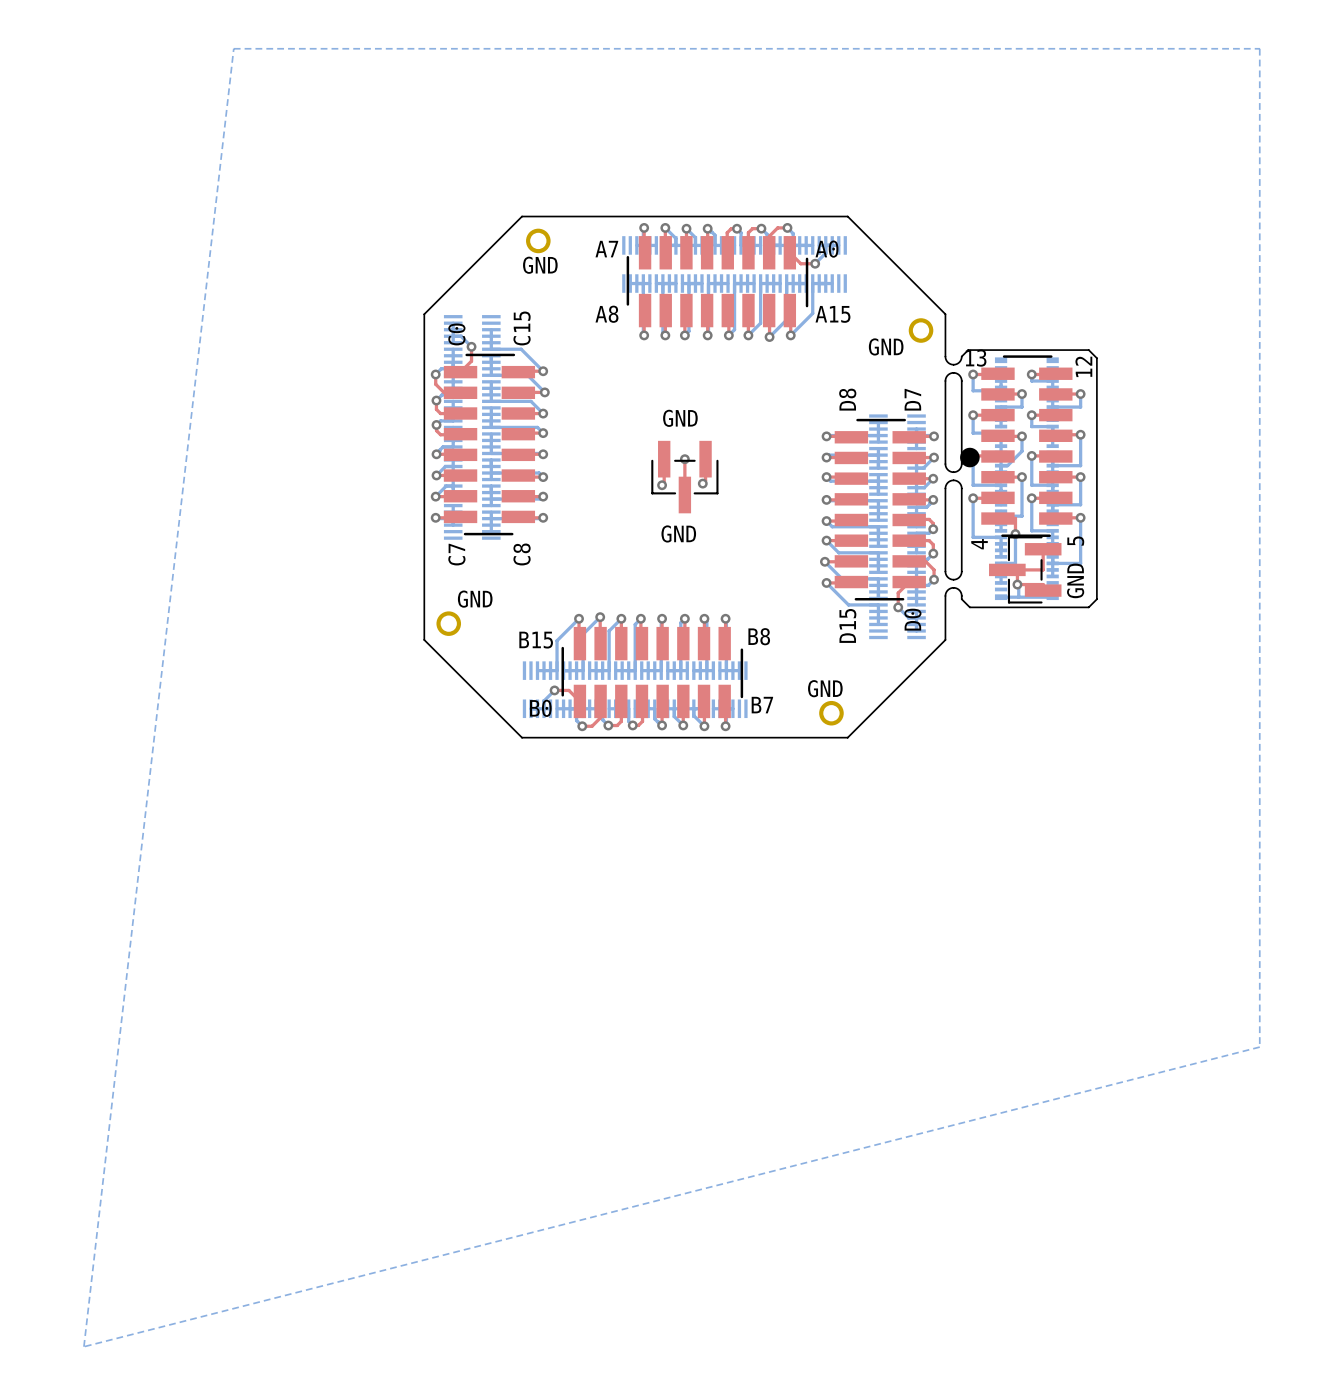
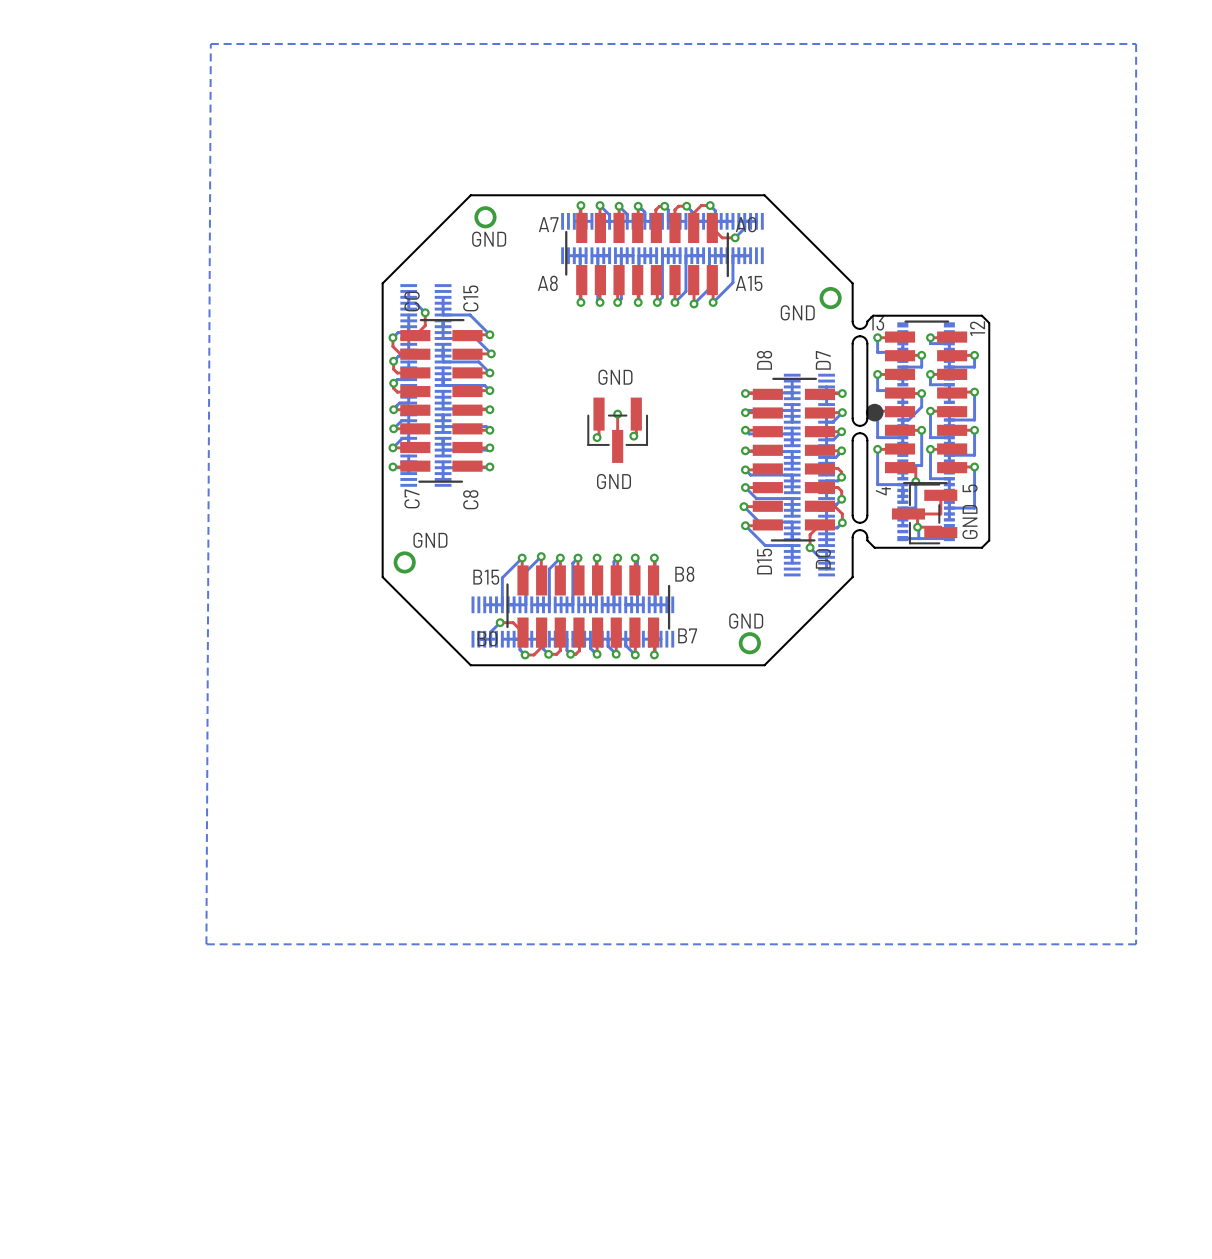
bottom zone outline: (233, 48) (83, 1346) (1259, 1047) -> (210, 43) (206, 944) (1136, 944)

